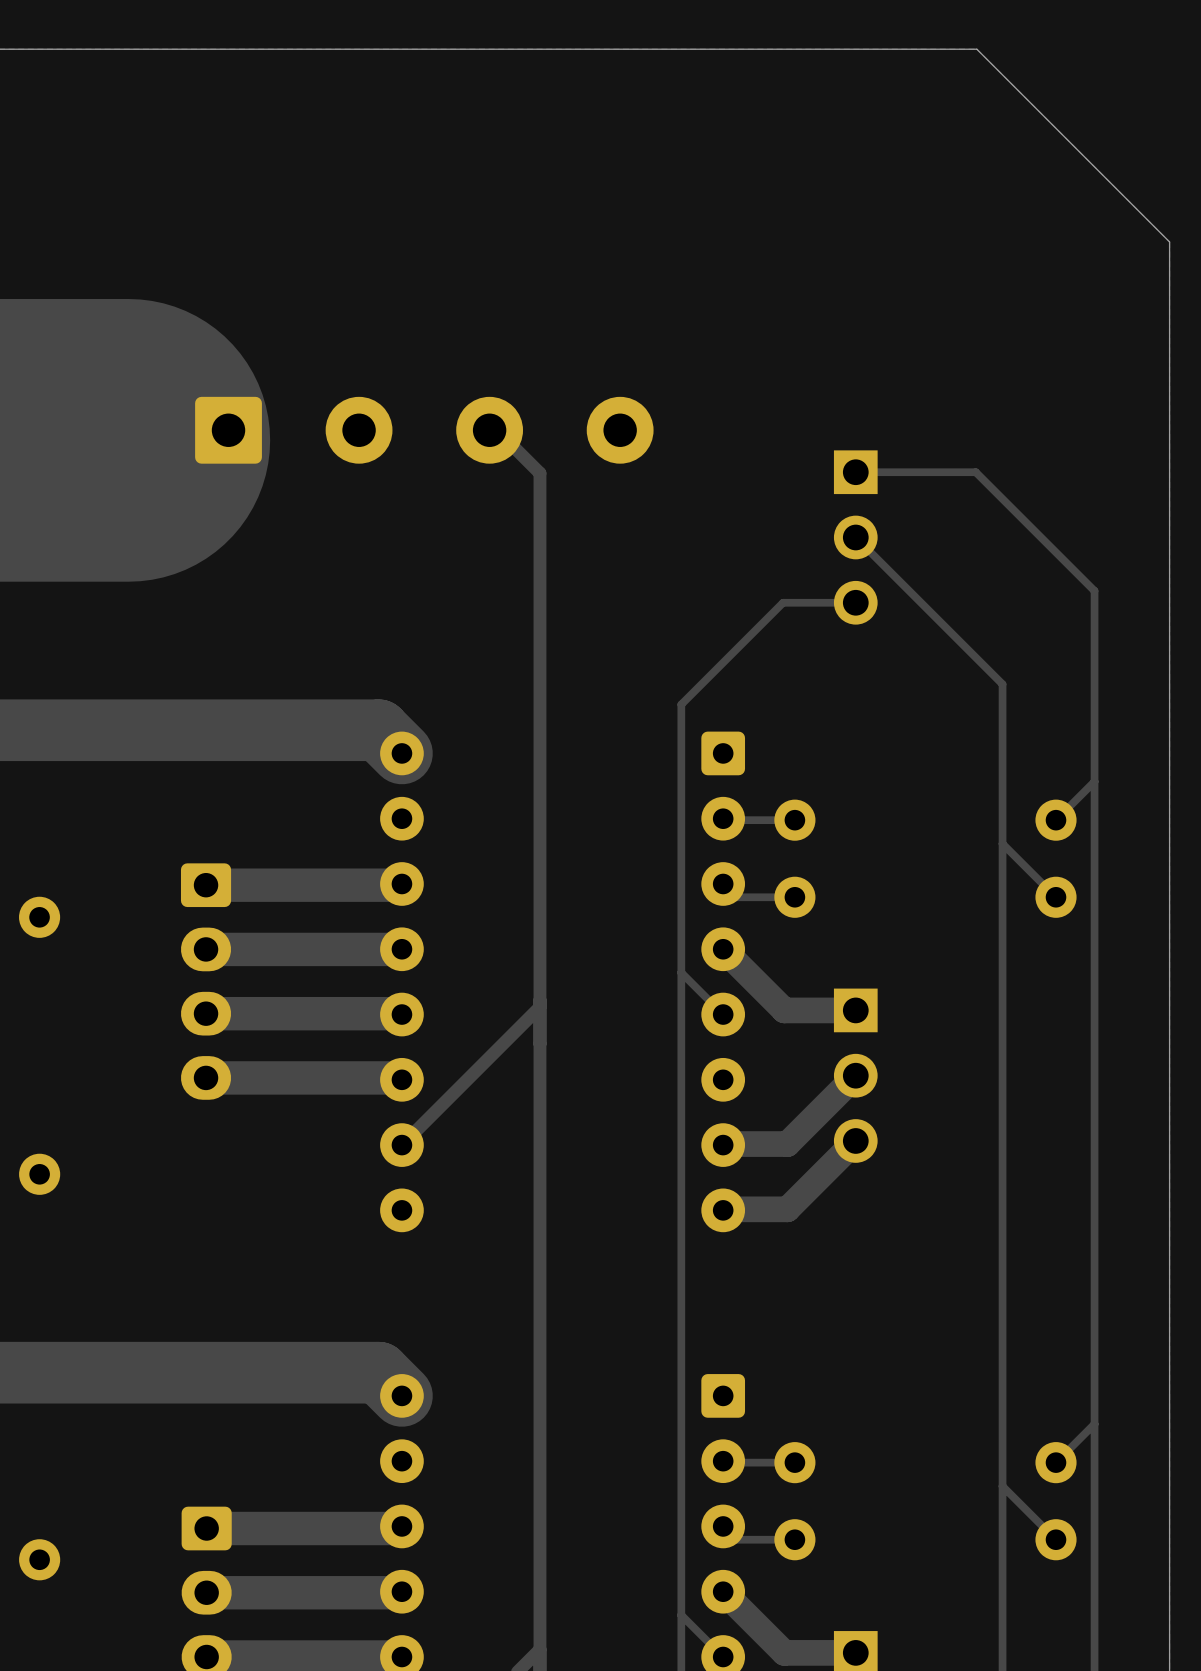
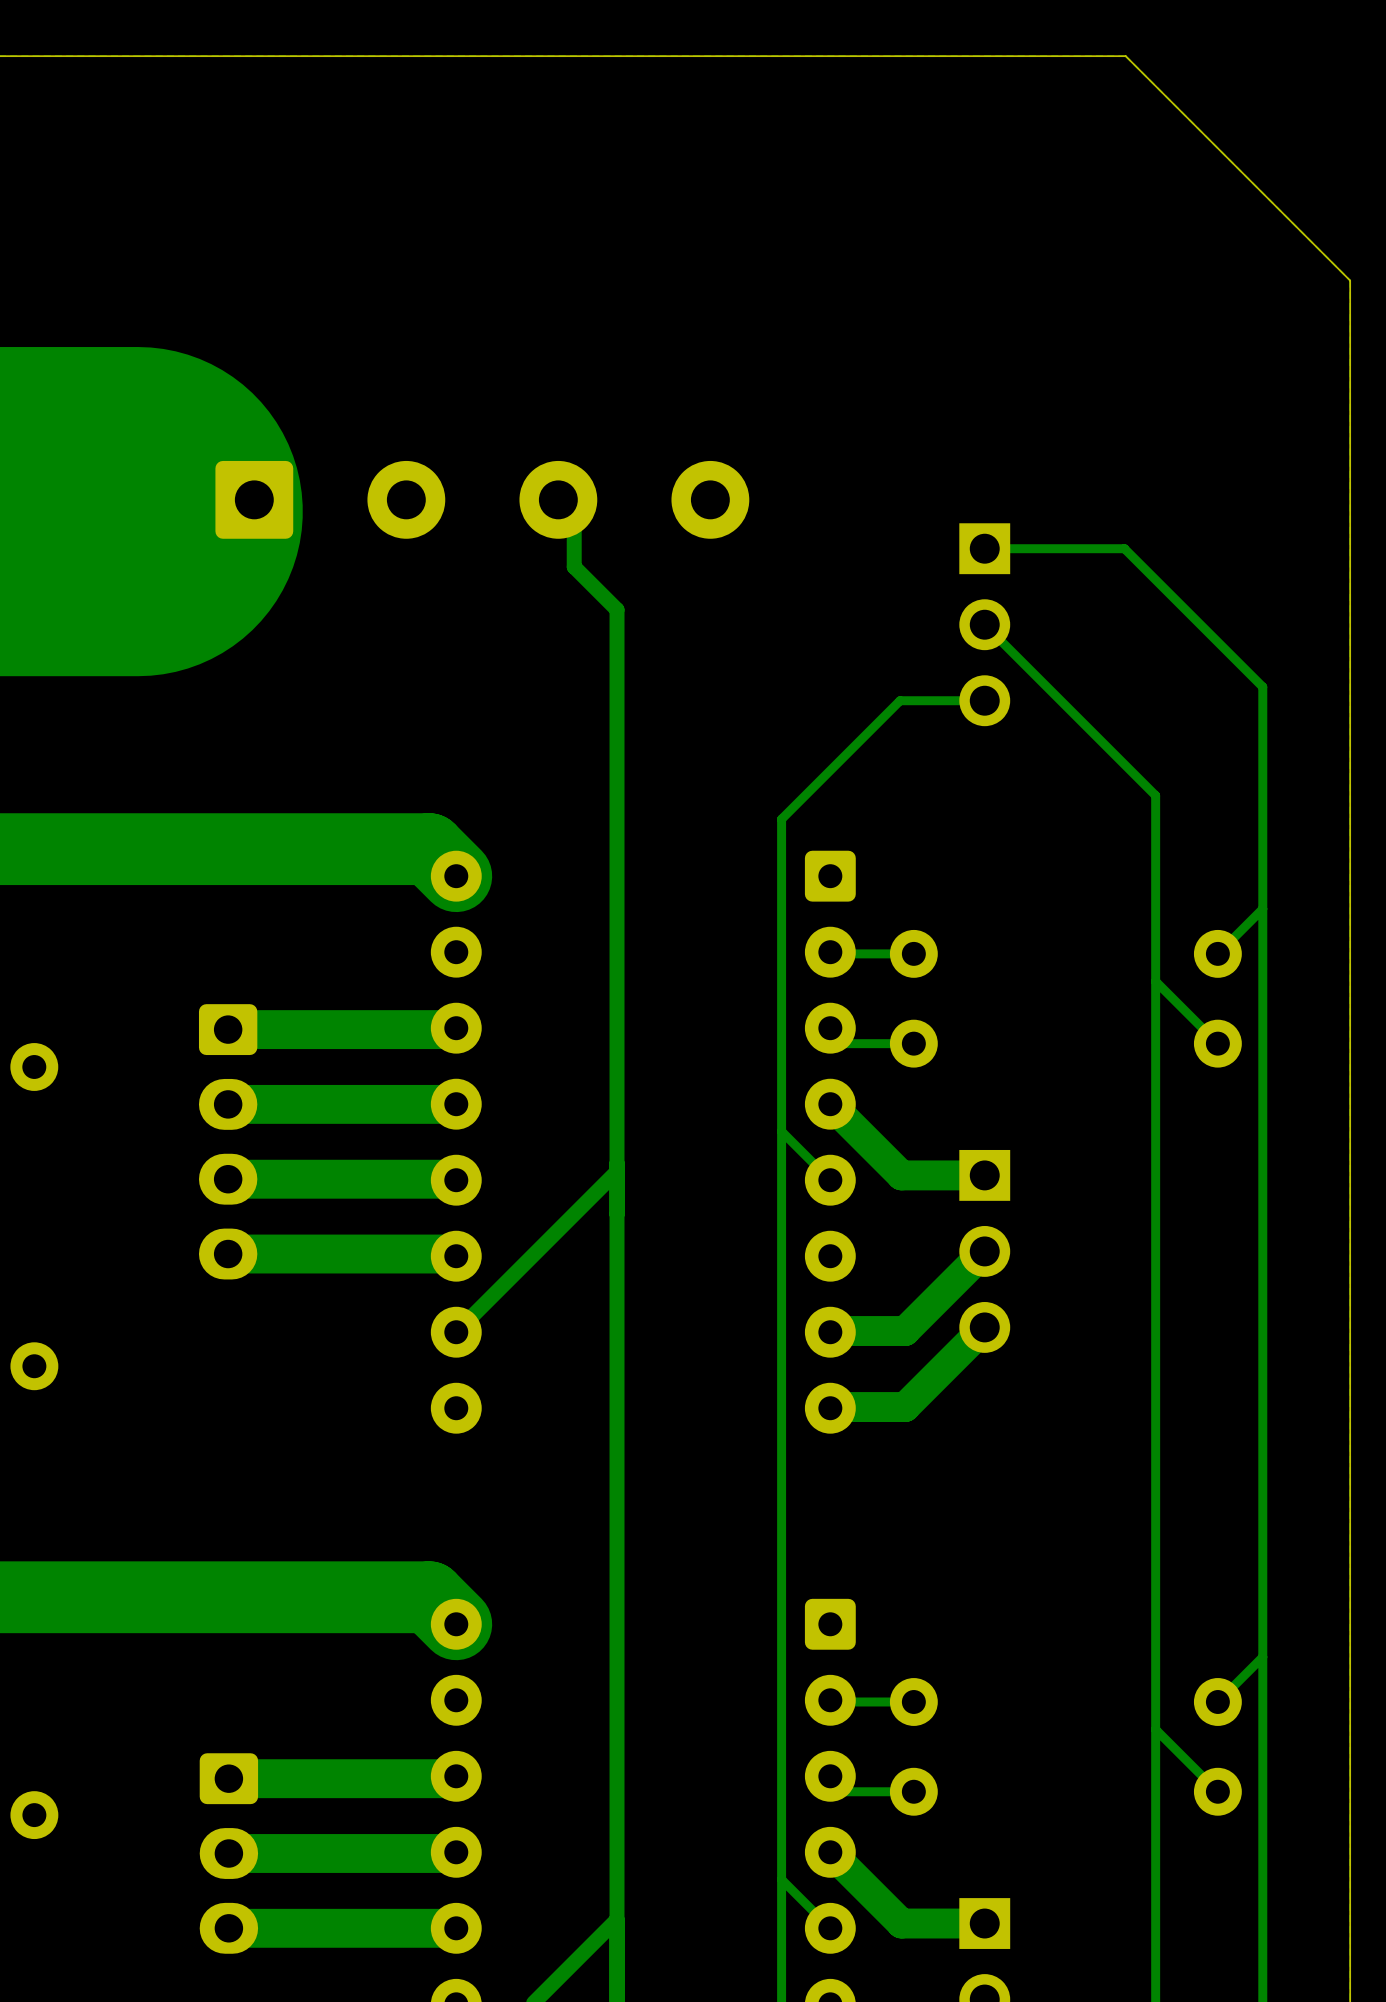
track: (503, 436) (539, 473) (539, 524) -> (574, 507) (574, 566) (617, 609)

